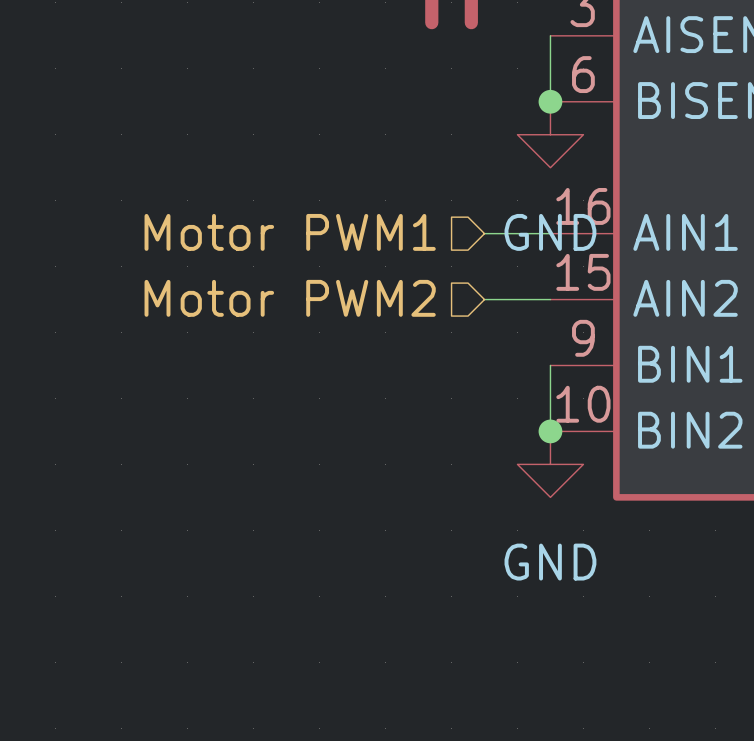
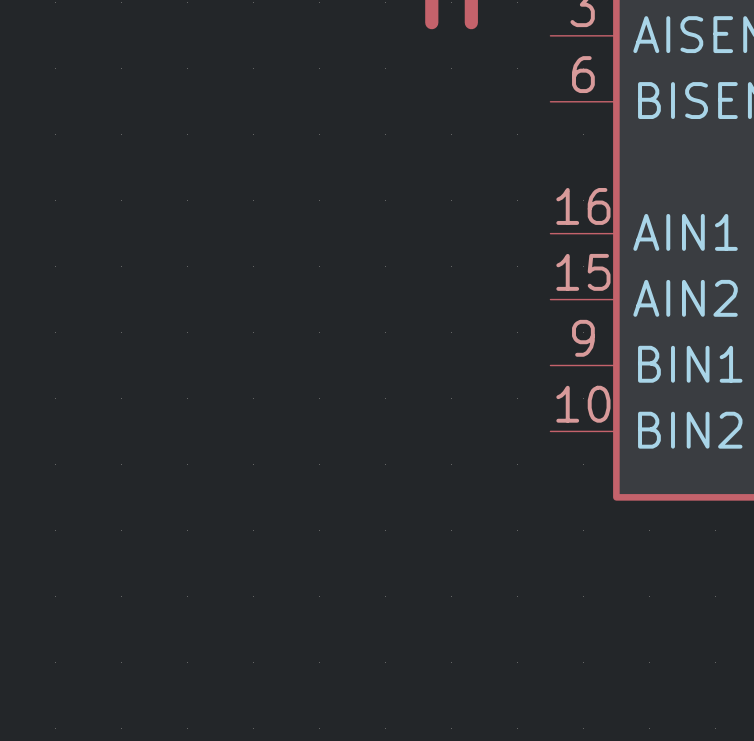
wire: (550, 35) (550, 101) -> none
junction: (550, 101) -> none
power symbol: GND (550, 134) -> none
hierarchical label: Motor PWM1 (290, 232) -> none
wire: (484, 233) (550, 233) -> none
hierarchical label: Motor PWM2 (290, 298) -> none
wire: (484, 299) (550, 299) -> none
wire: (550, 365) (550, 431) -> none
junction: (550, 431) -> none
power symbol: GND (550, 464) -> none

